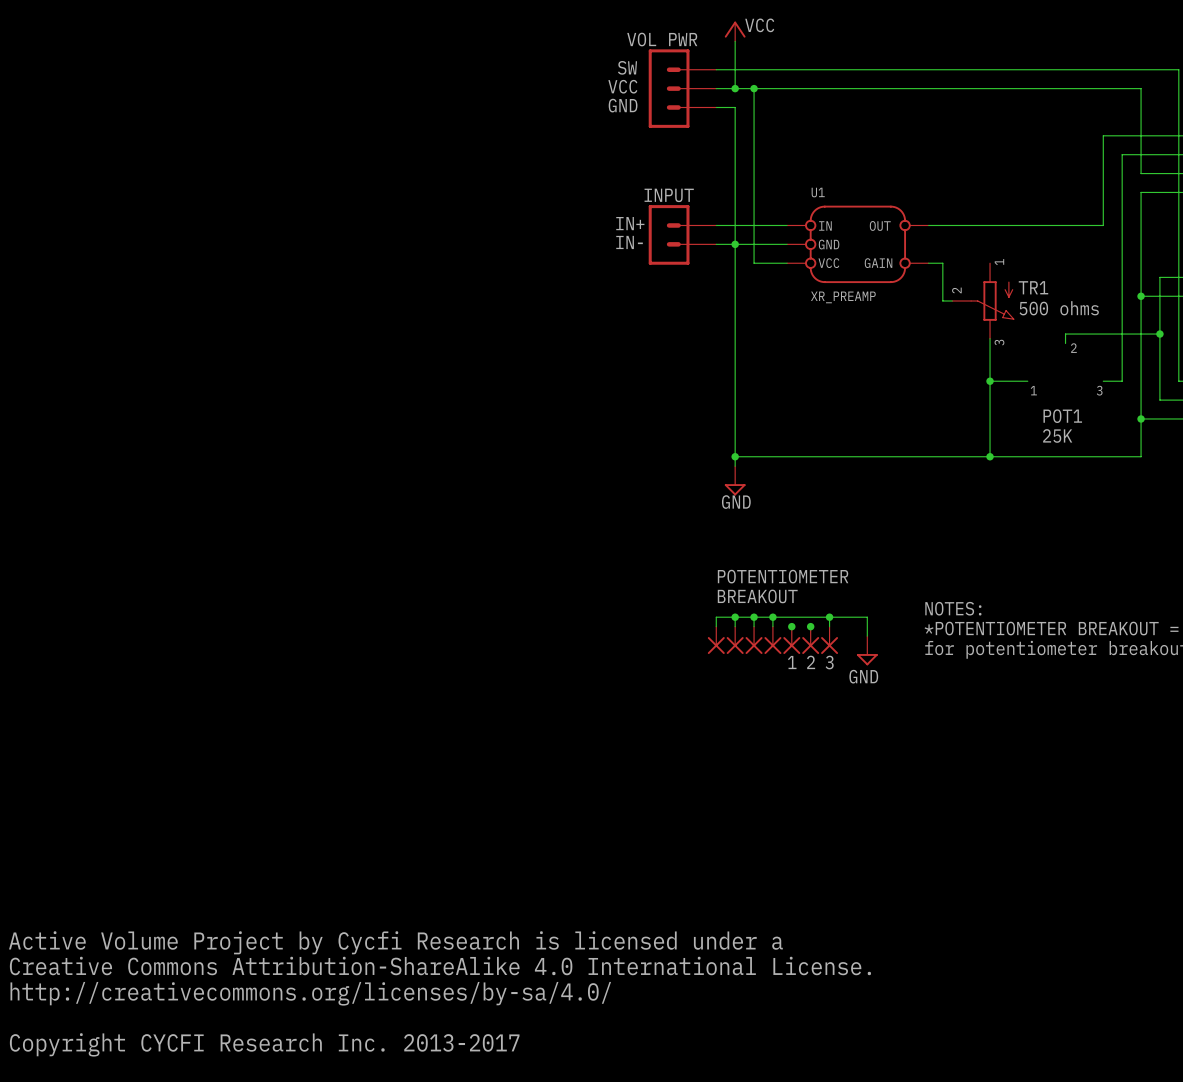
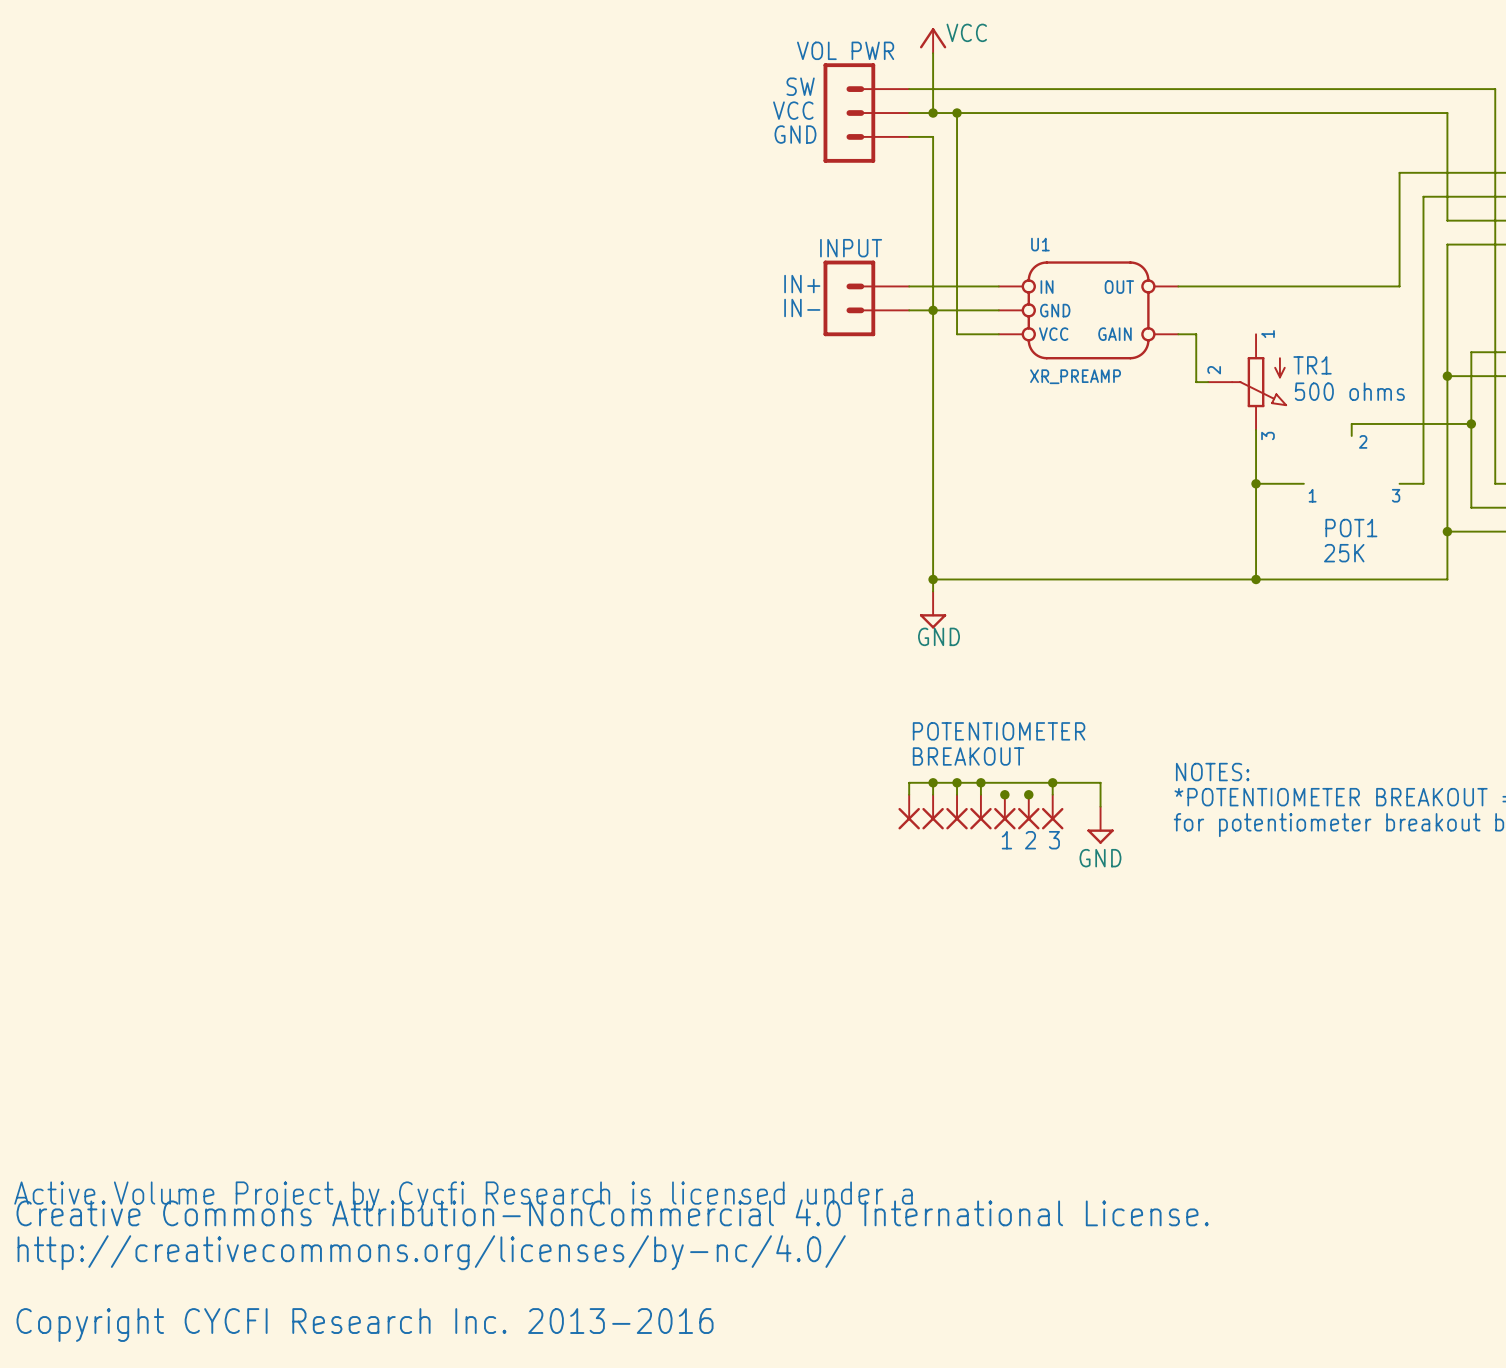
text: Creative Commons Attribution-ShareAlike 4.0 International License. (440, 966) -> Creative Commons Attribution-NonCommercial 4.0 International License. (612, 1212)
text: http://creativecommons.org/licenses/by-sa/4.0/ (310, 993) -> http://creativecommons.org/licenses/by-nc/4.0/ (431, 1252)
text: Copyright CYCFI Research Inc. 2013-2017 (264, 1044) -> Copyright CYCFI Research Inc. 2013-2016 (365, 1325)

